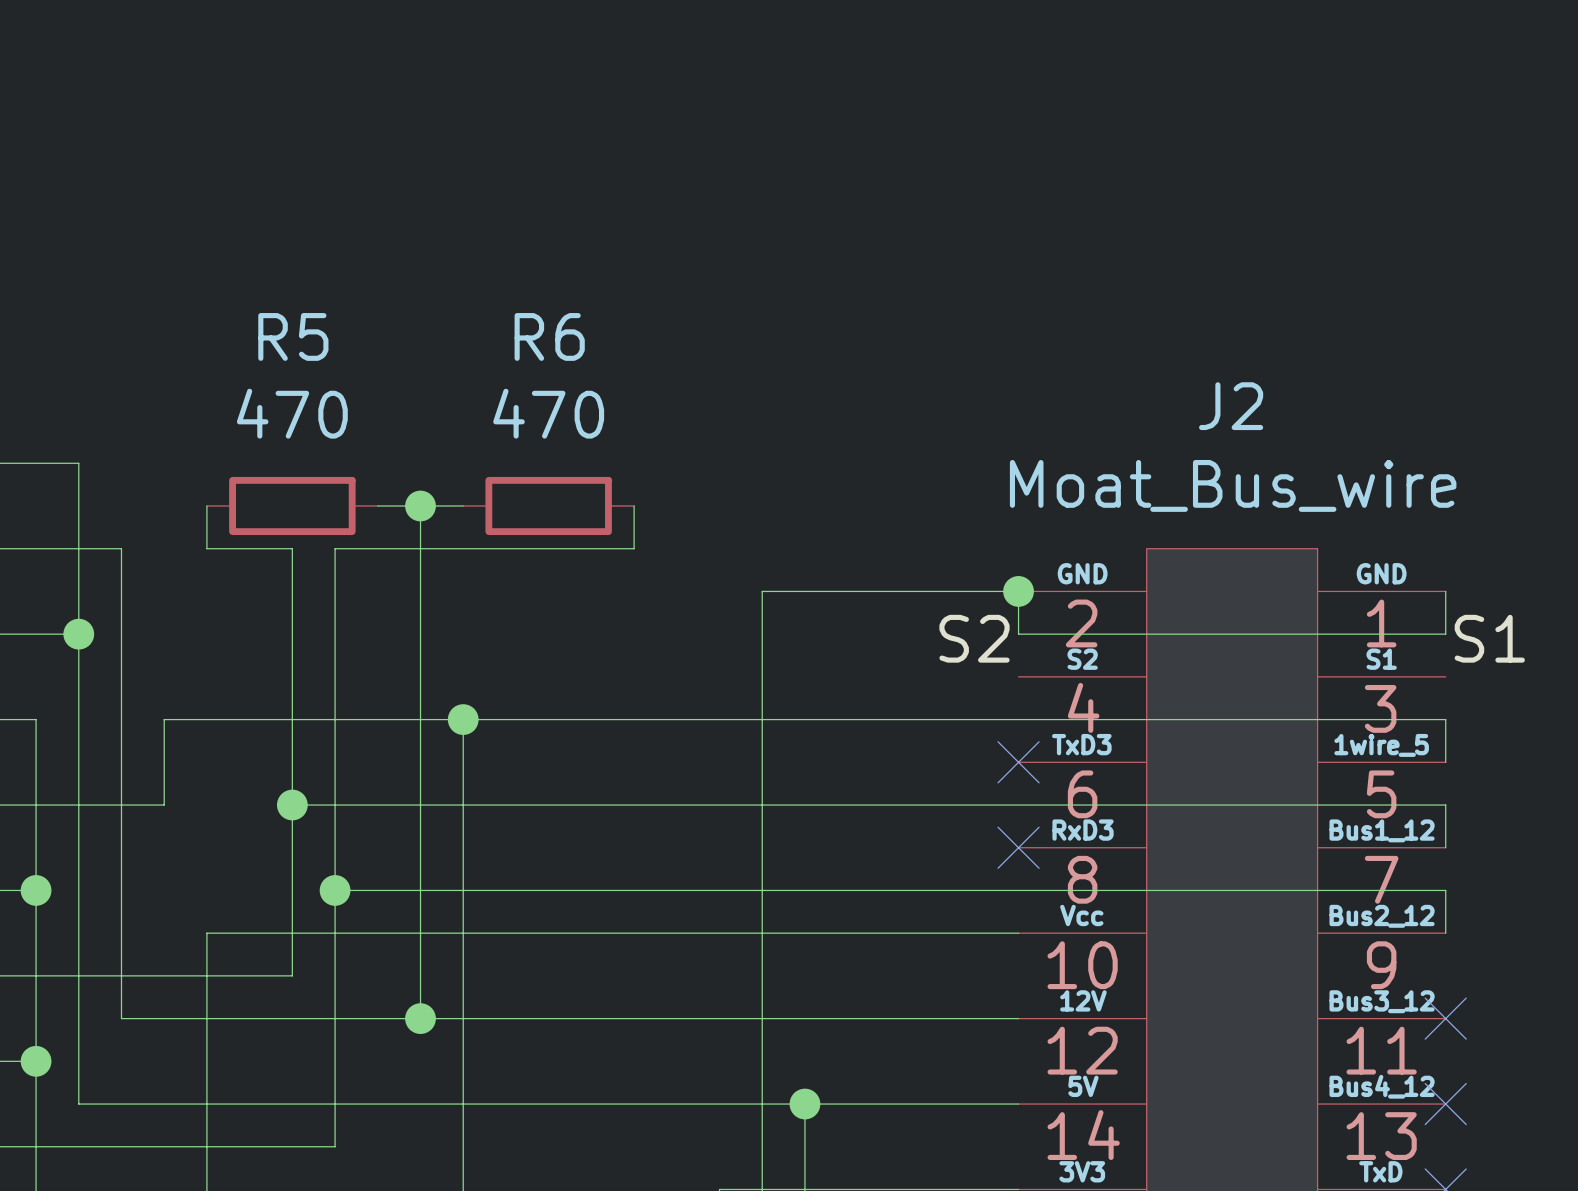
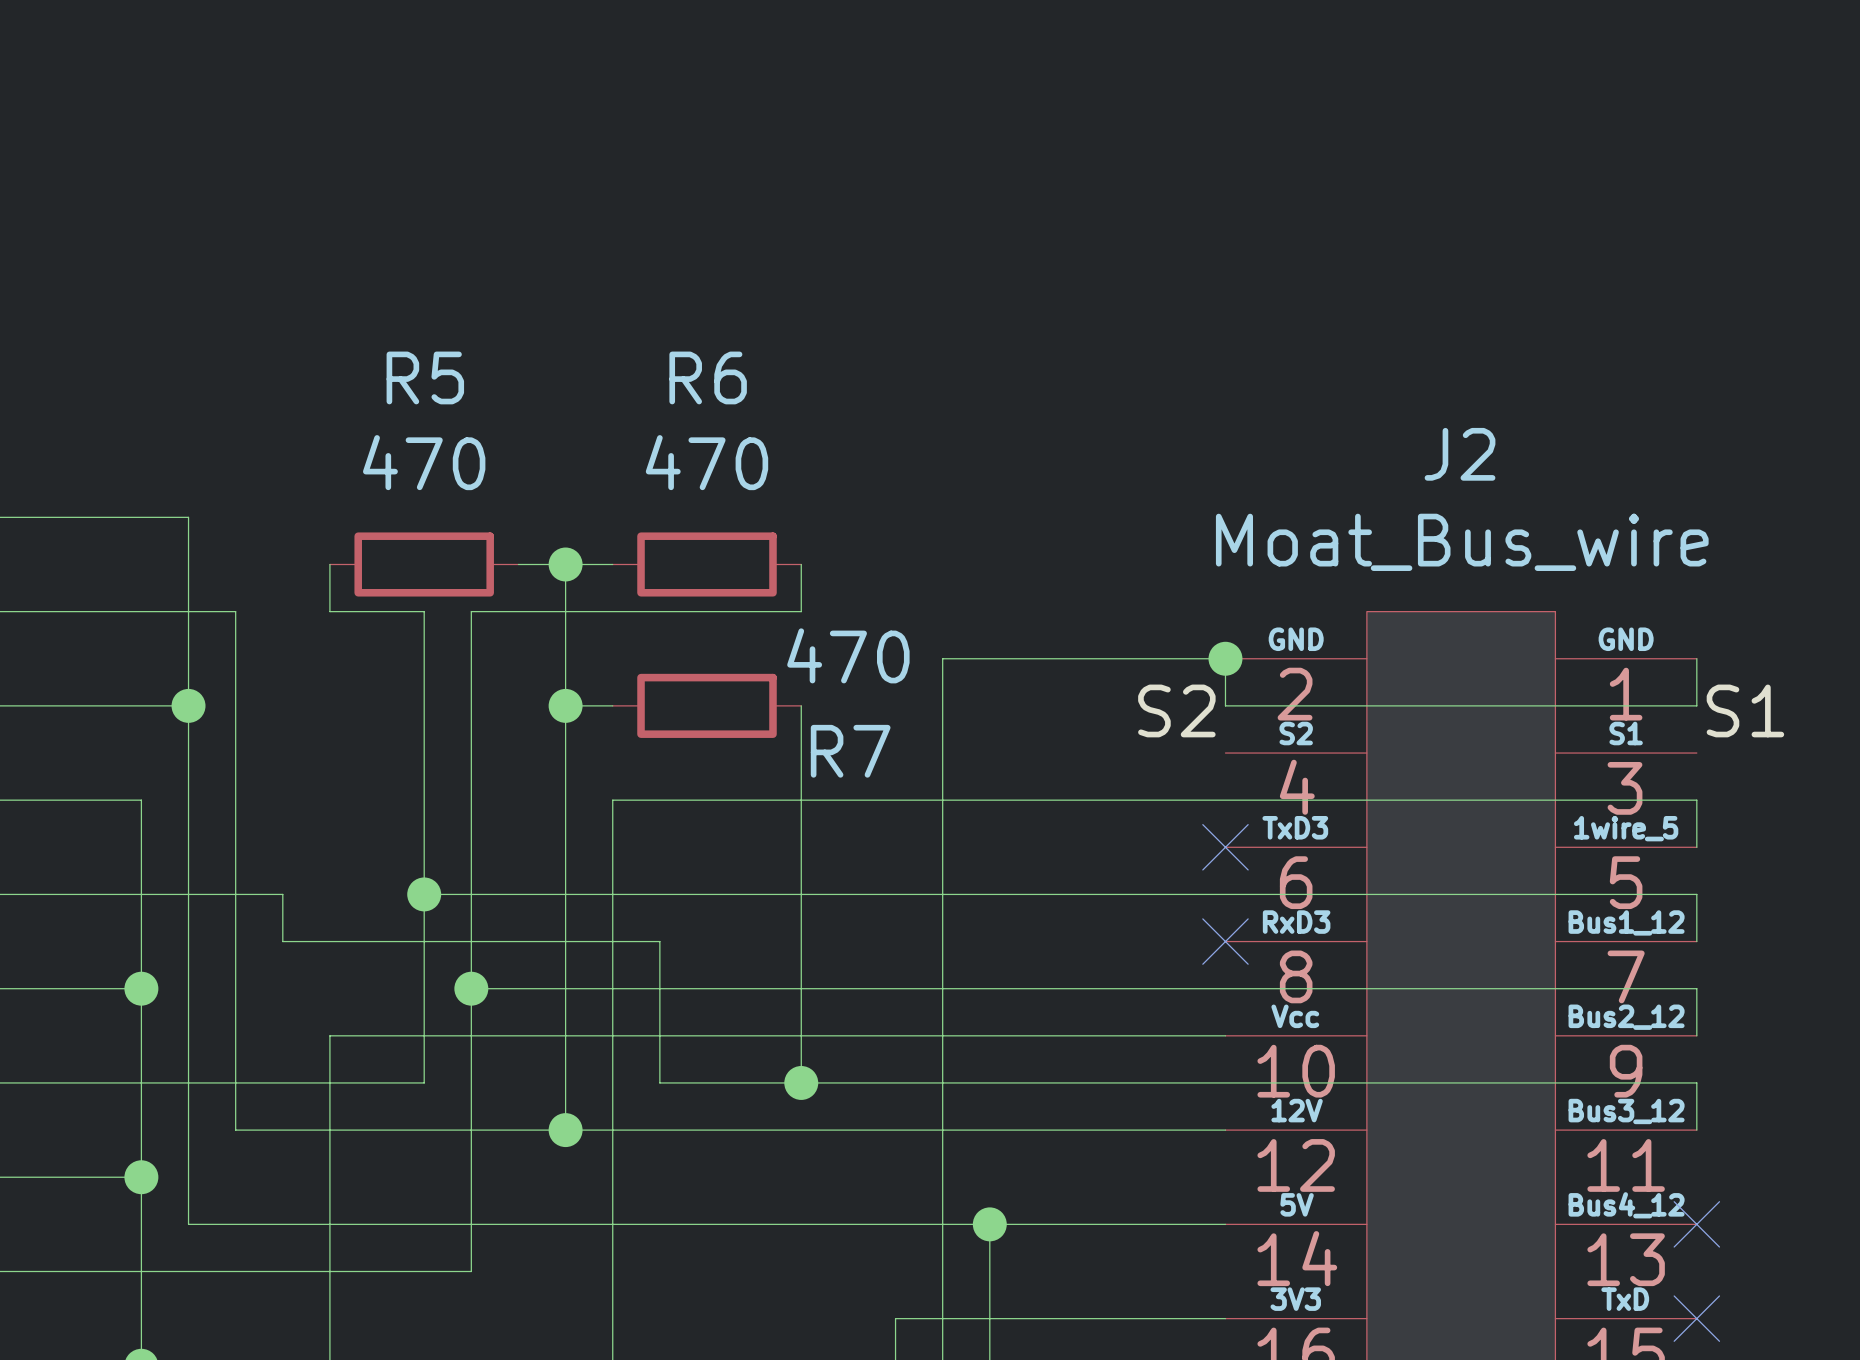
wire: none -> (565, 705) (612, 705)
R7: none -> 470 (707, 705)
wire: none -> (801, 705) (801, 1082)
wire: (463, 719) (164, 719) (164, 805) -> (1696, 1130) (1696, 1082) (659, 1082) (659, 941) (282, 941) (282, 894)
junction position: (463, 719) -> (565, 705)
junction: none -> (801, 1082)
no-connect mark: (1445, 1018) -> none

